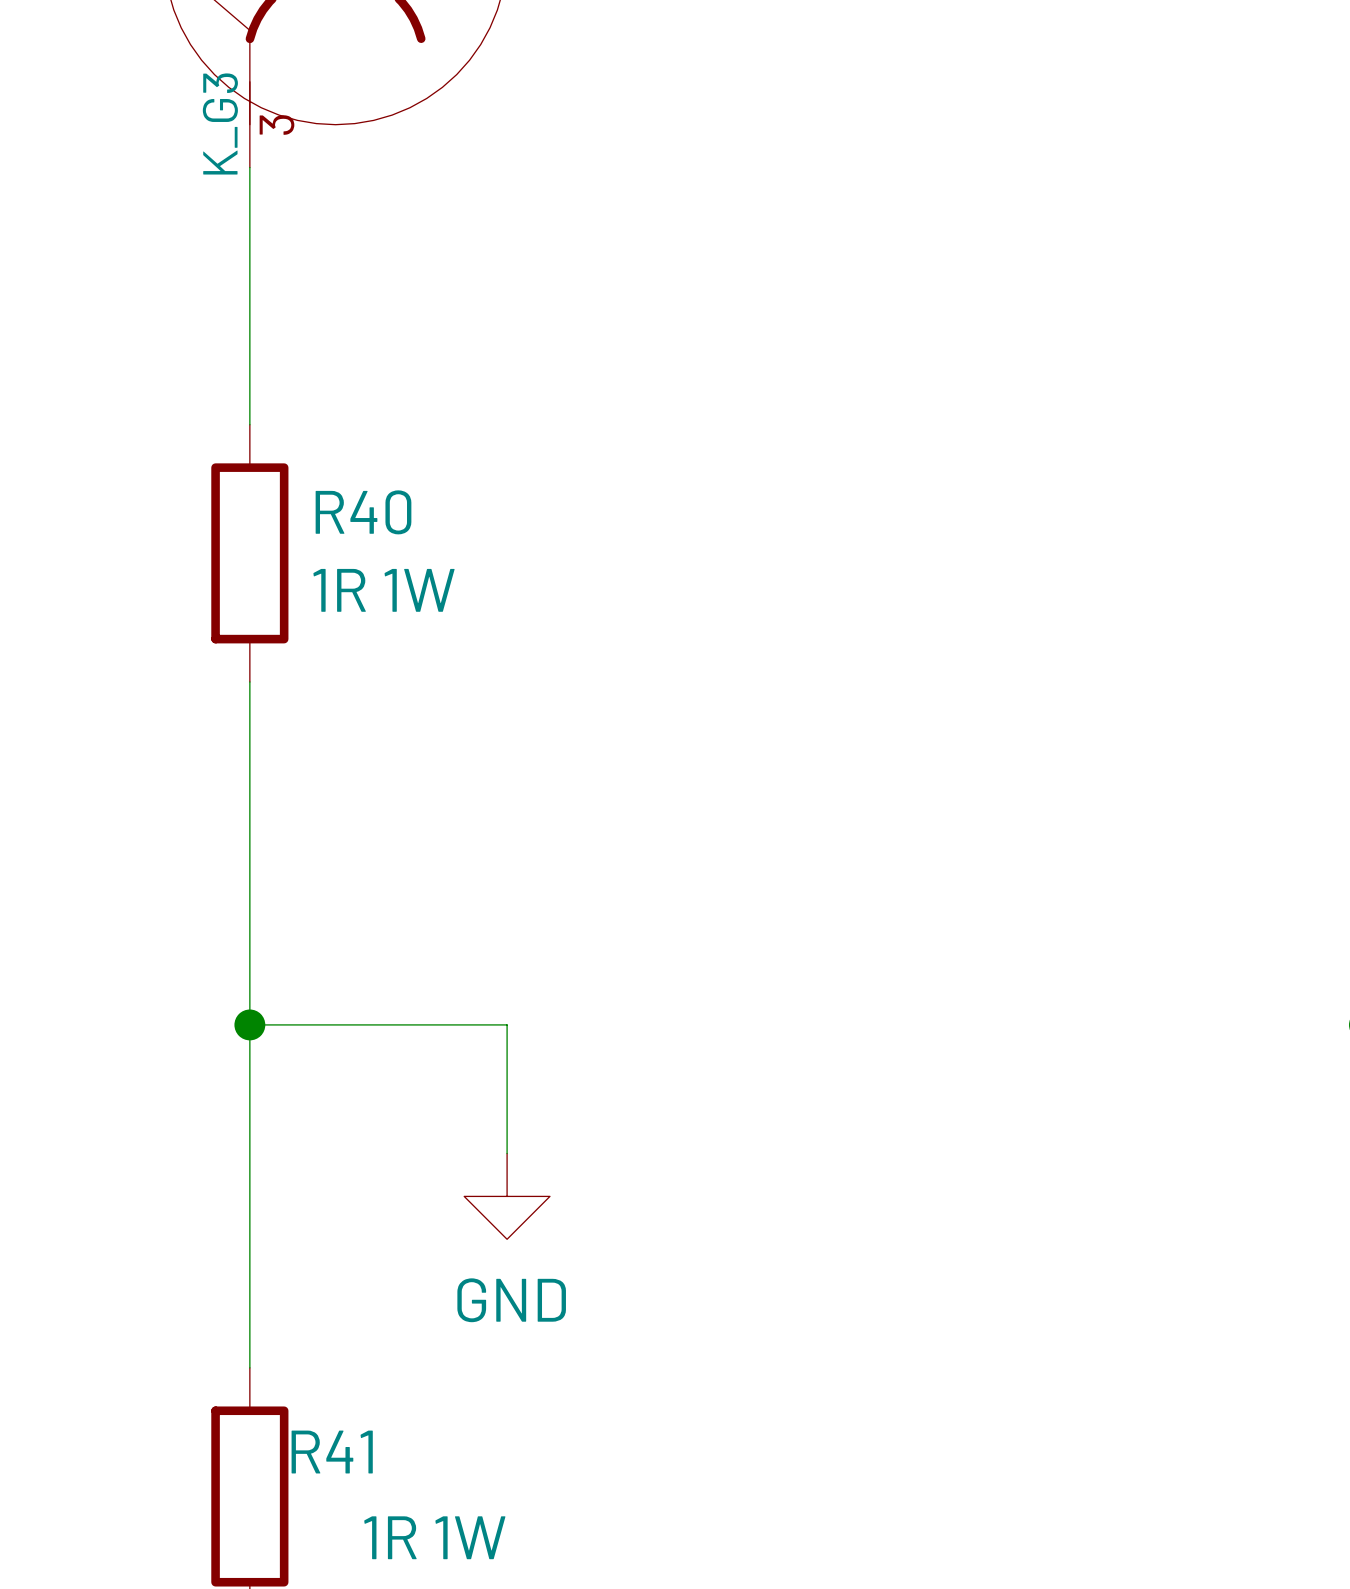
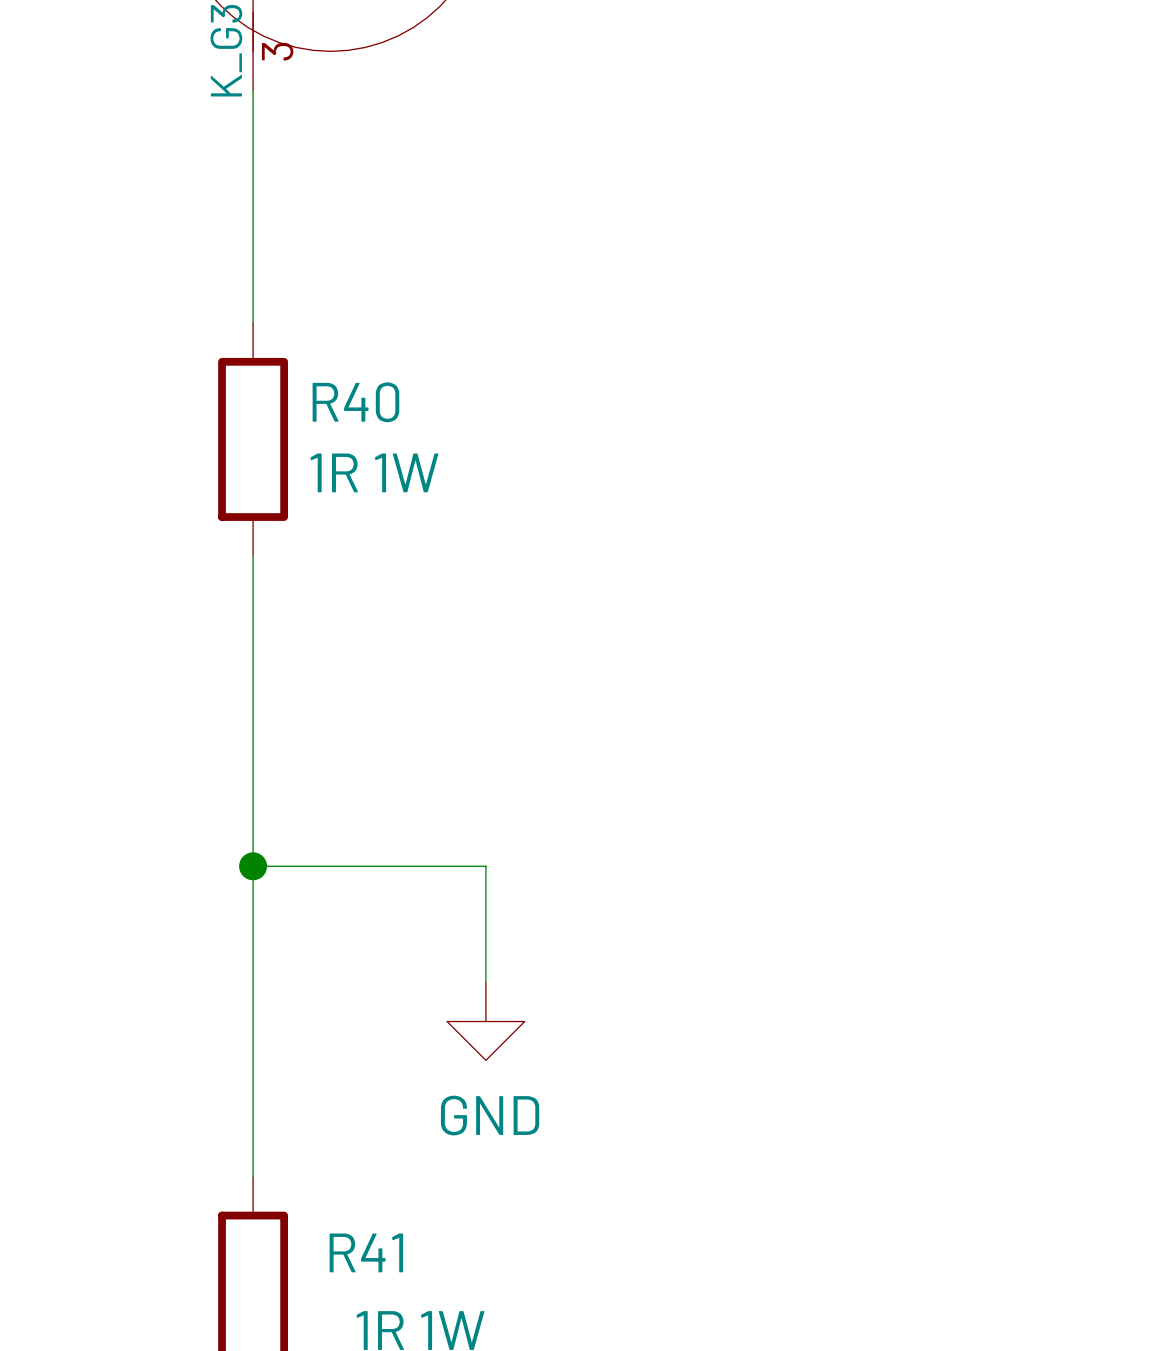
R41 name position: R41 (332, 1452) -> R41 (366, 1252)

